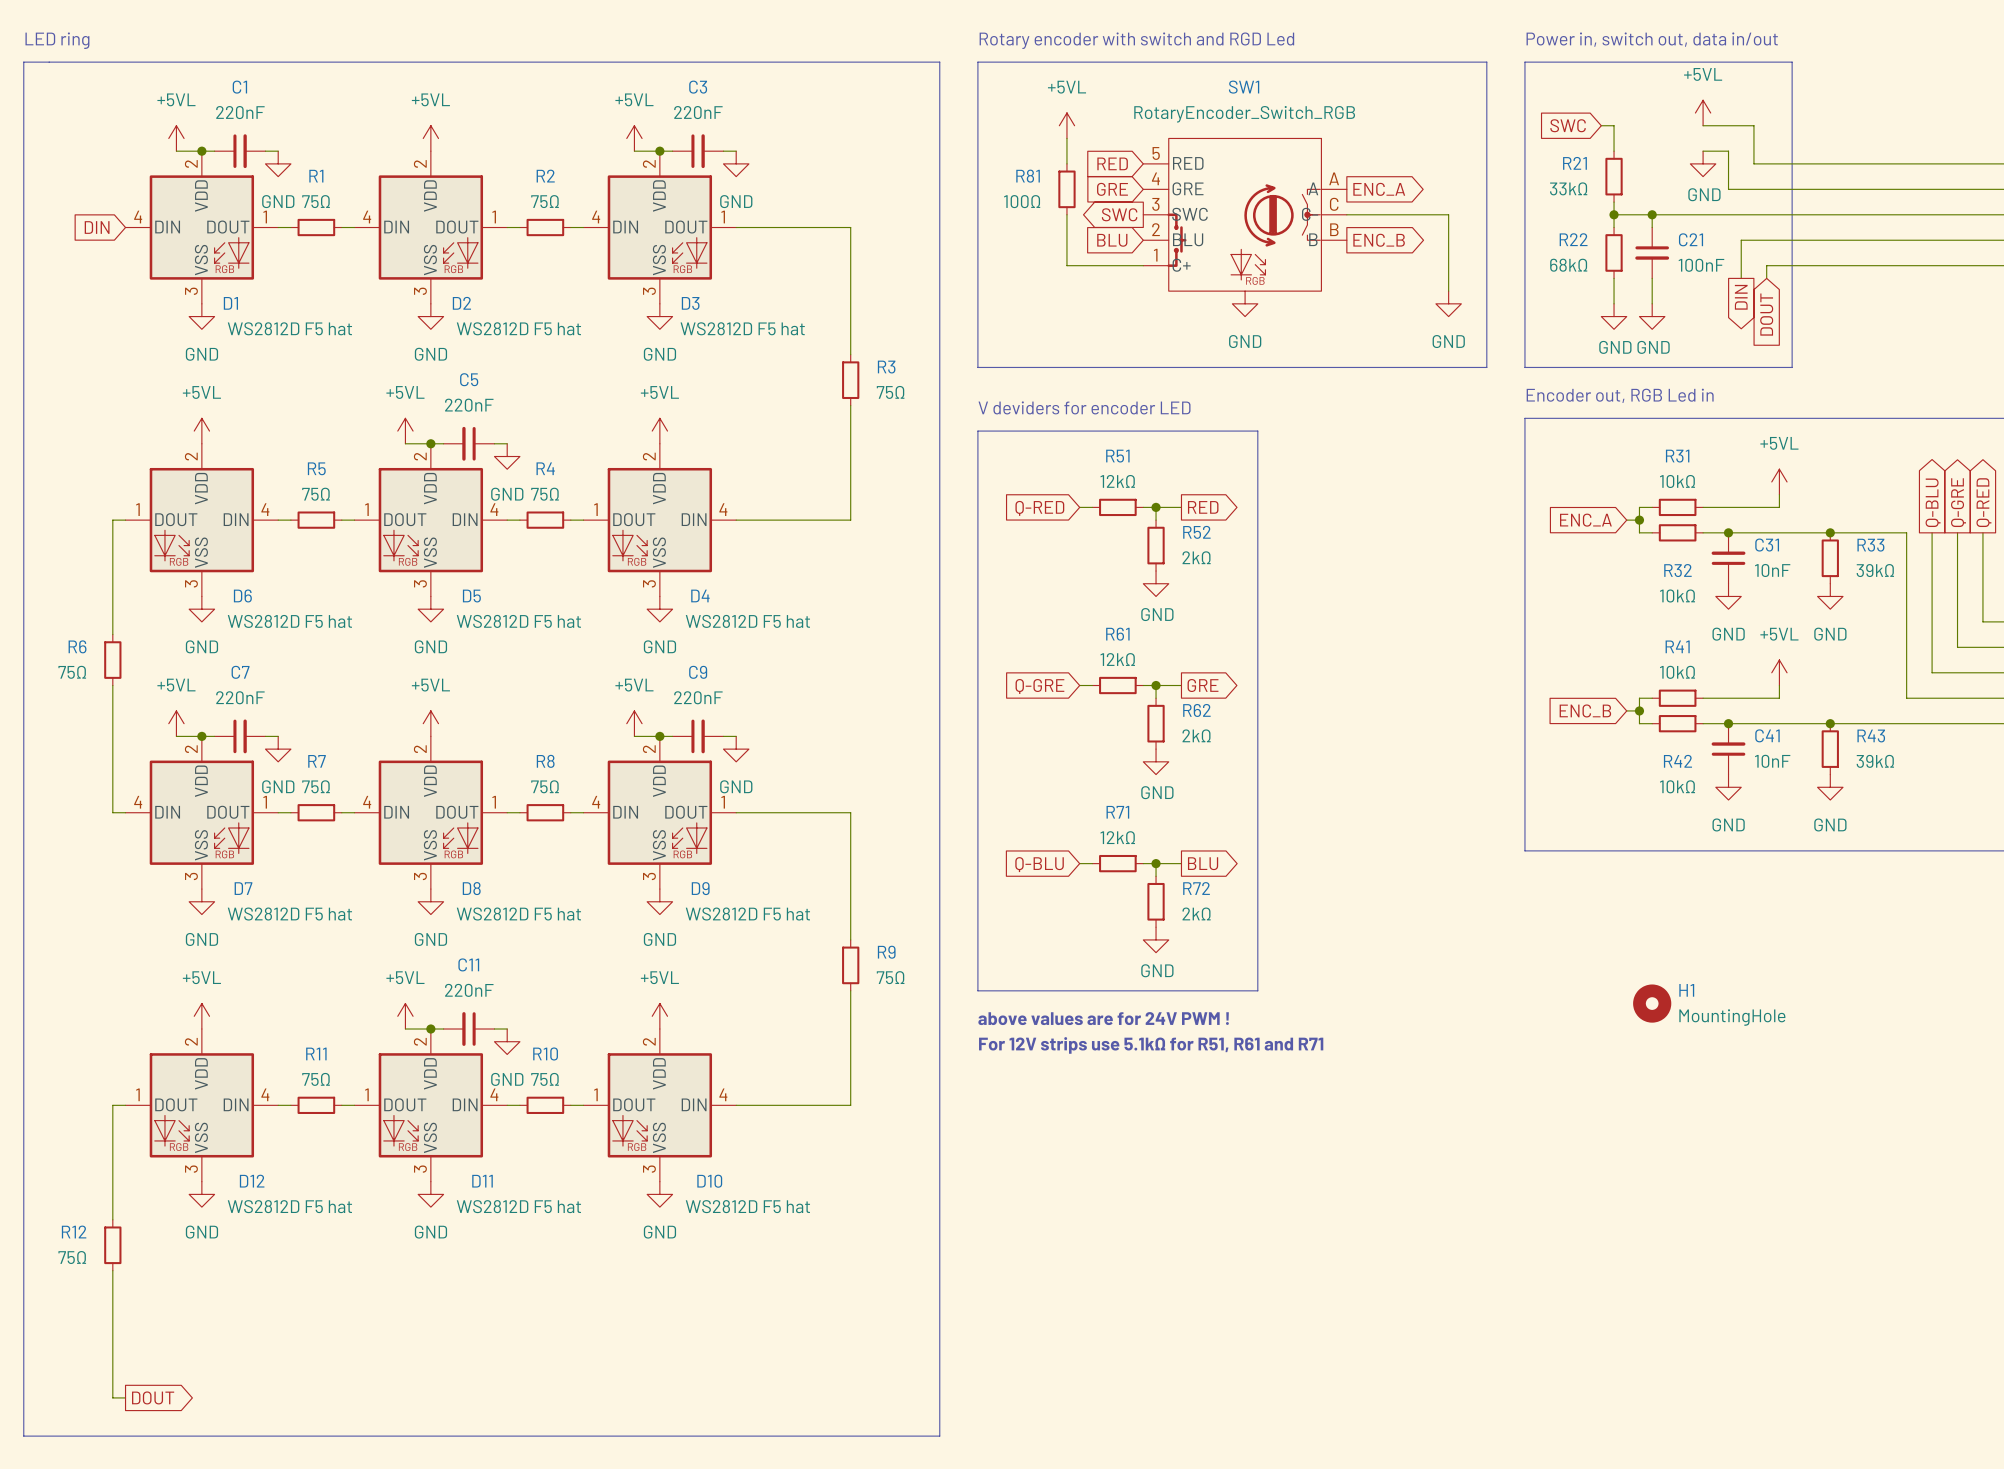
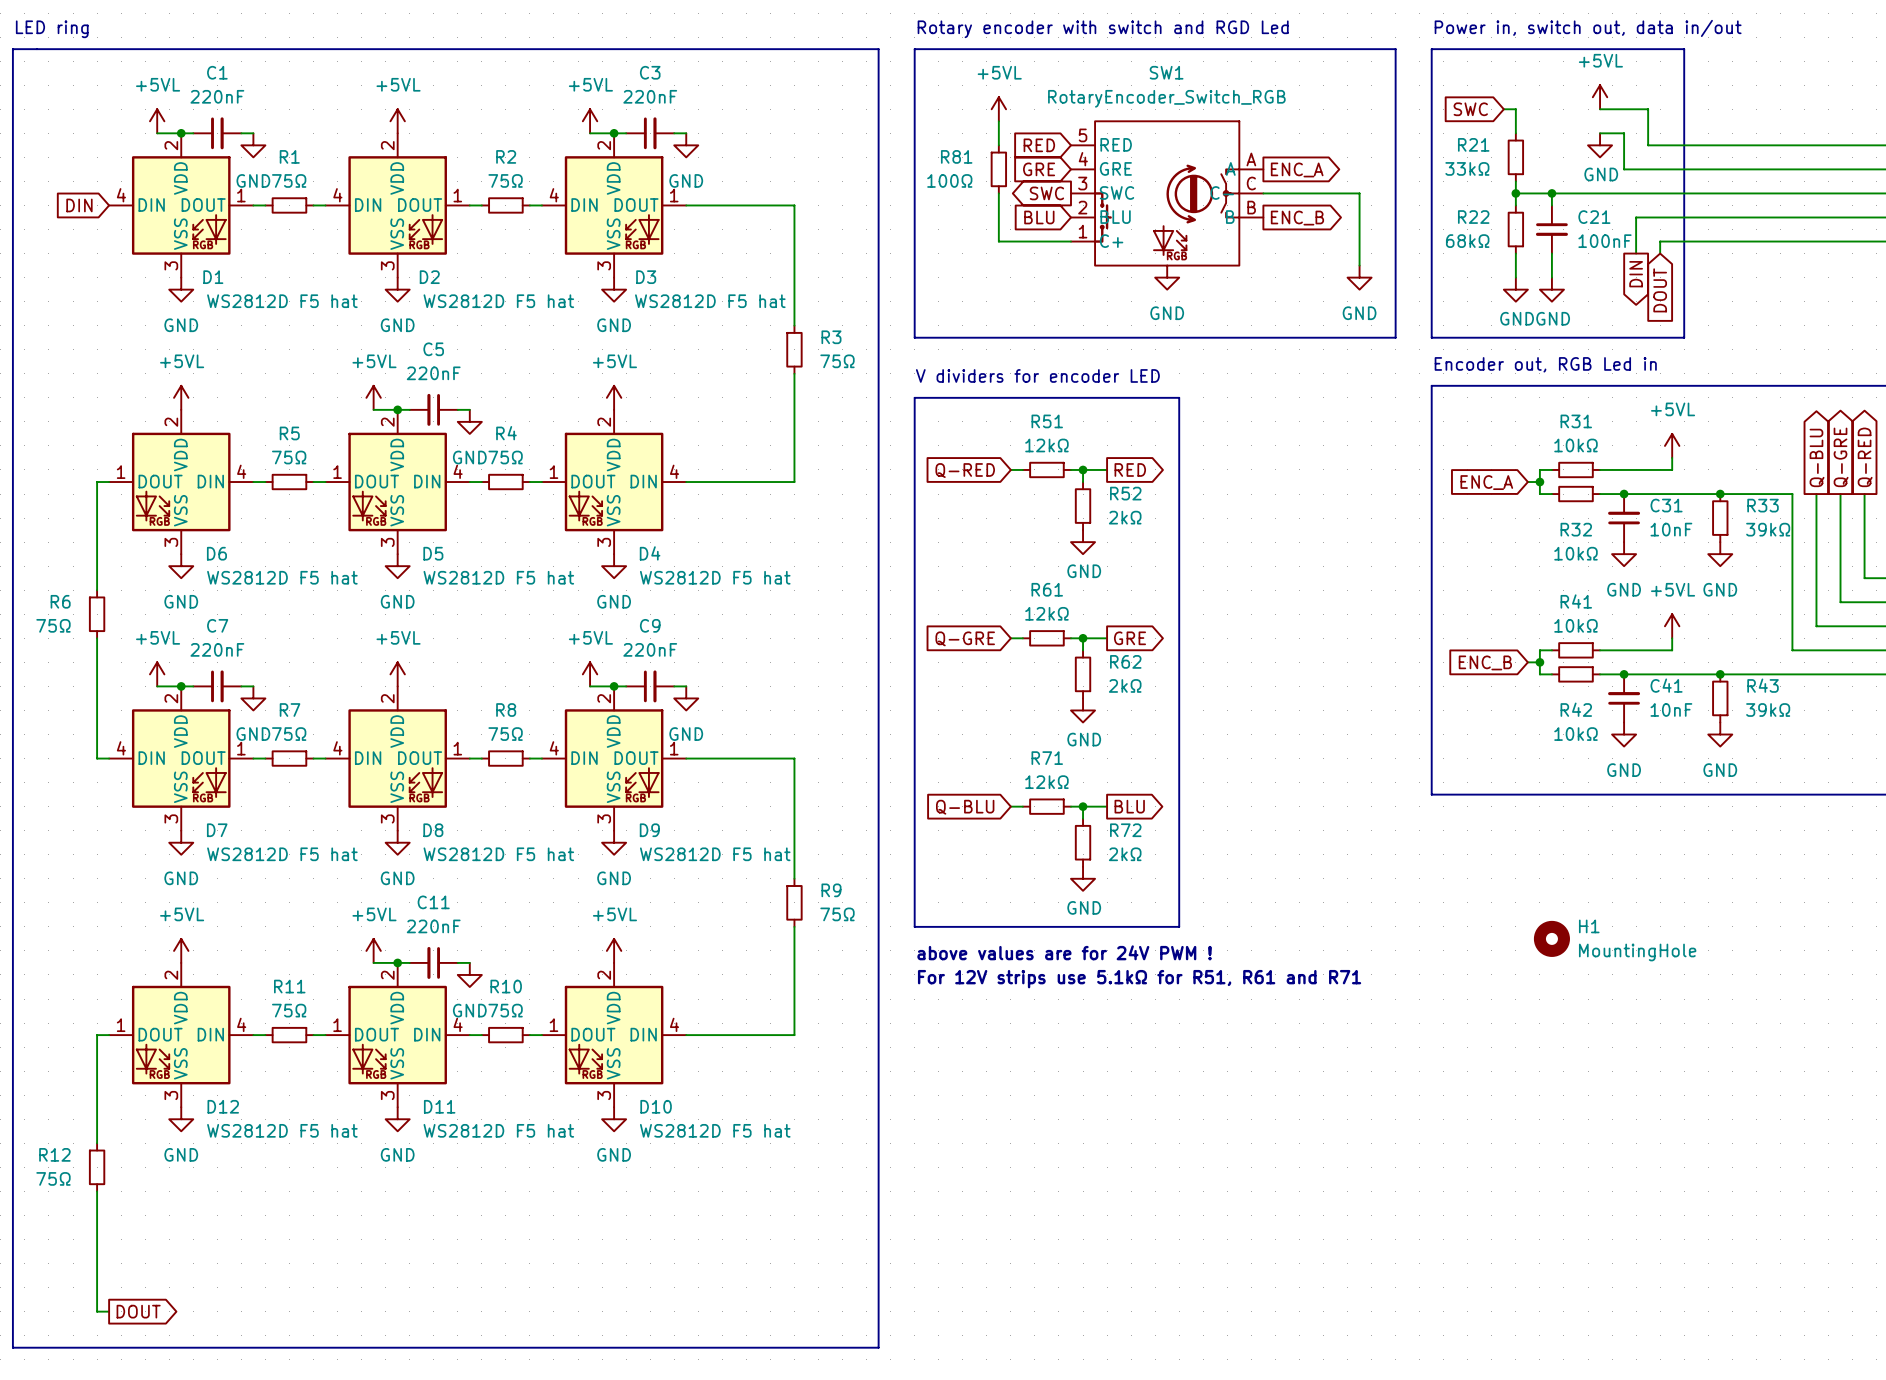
text: V deviders for encoder LED (1084, 407) -> V dividers for encoder LED (1037, 375)

